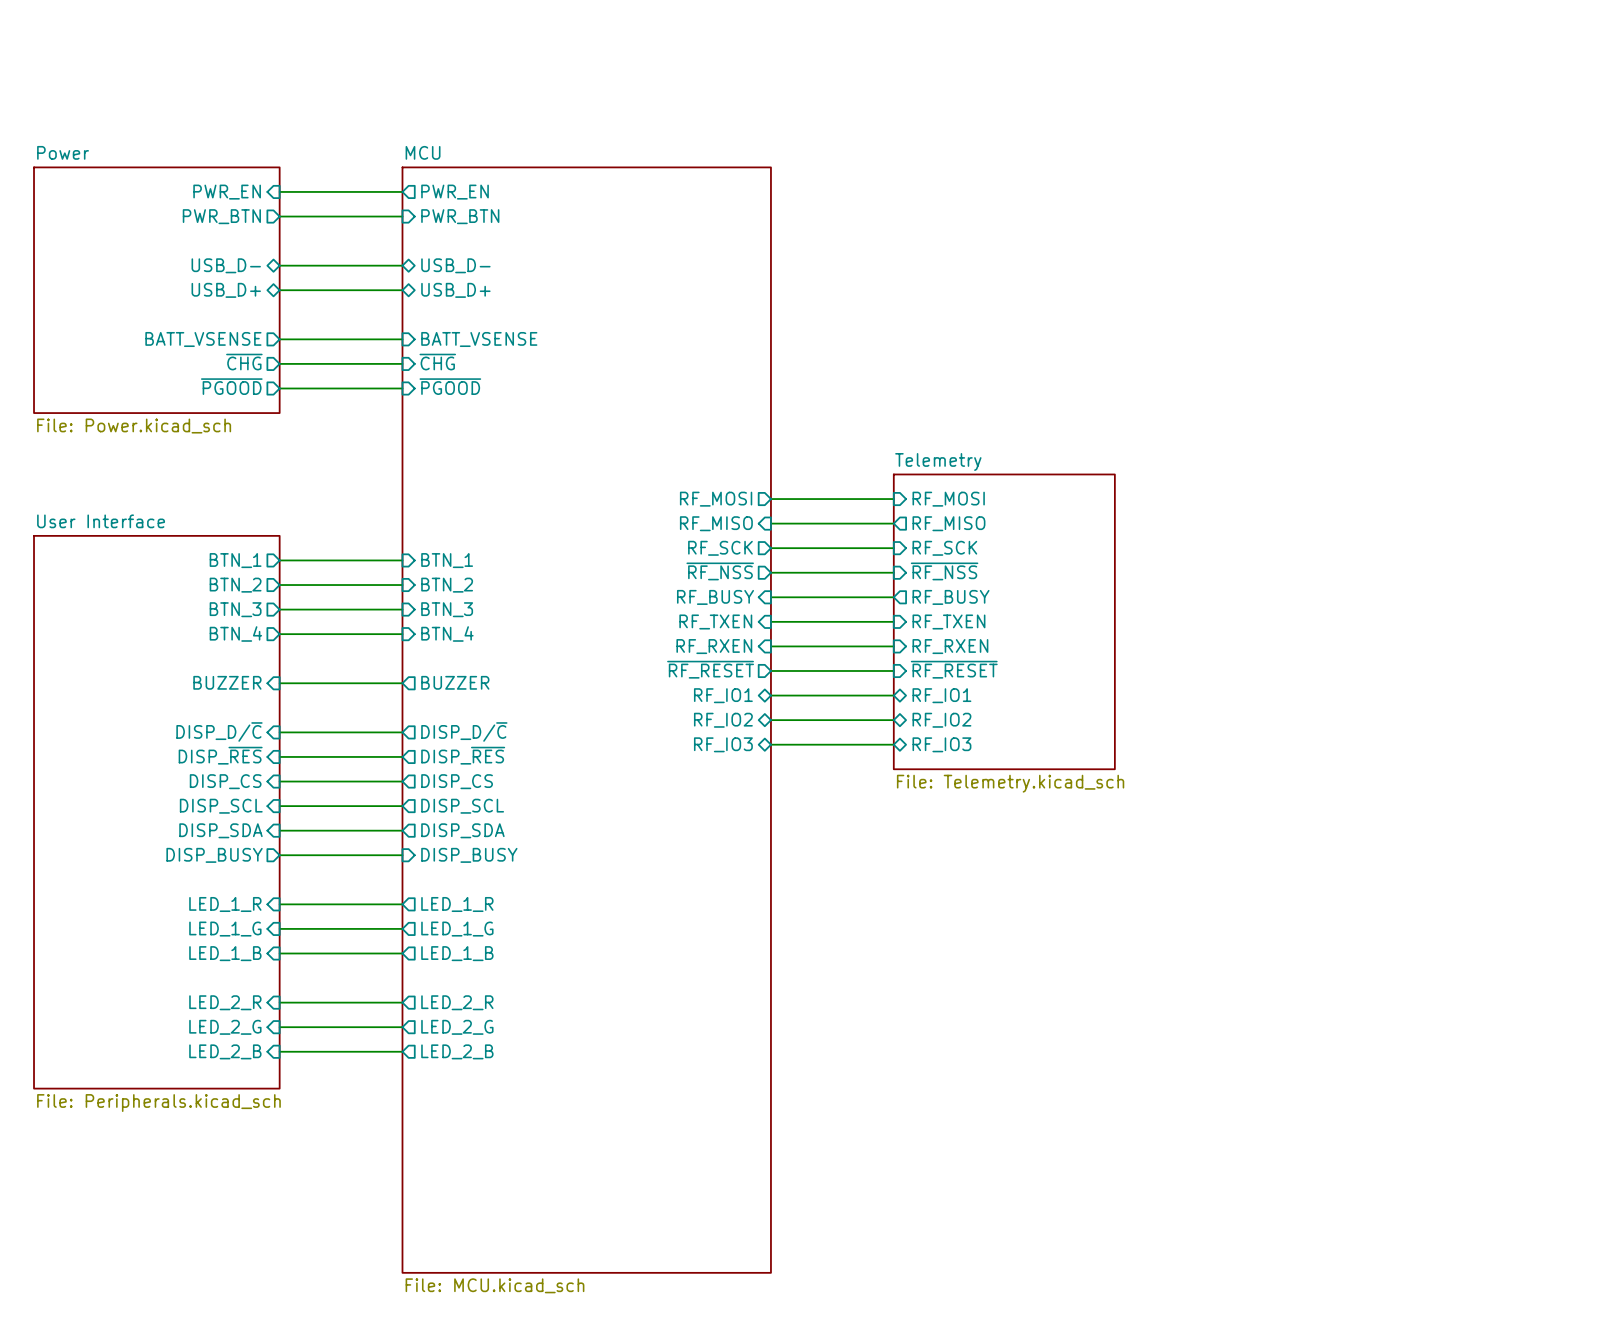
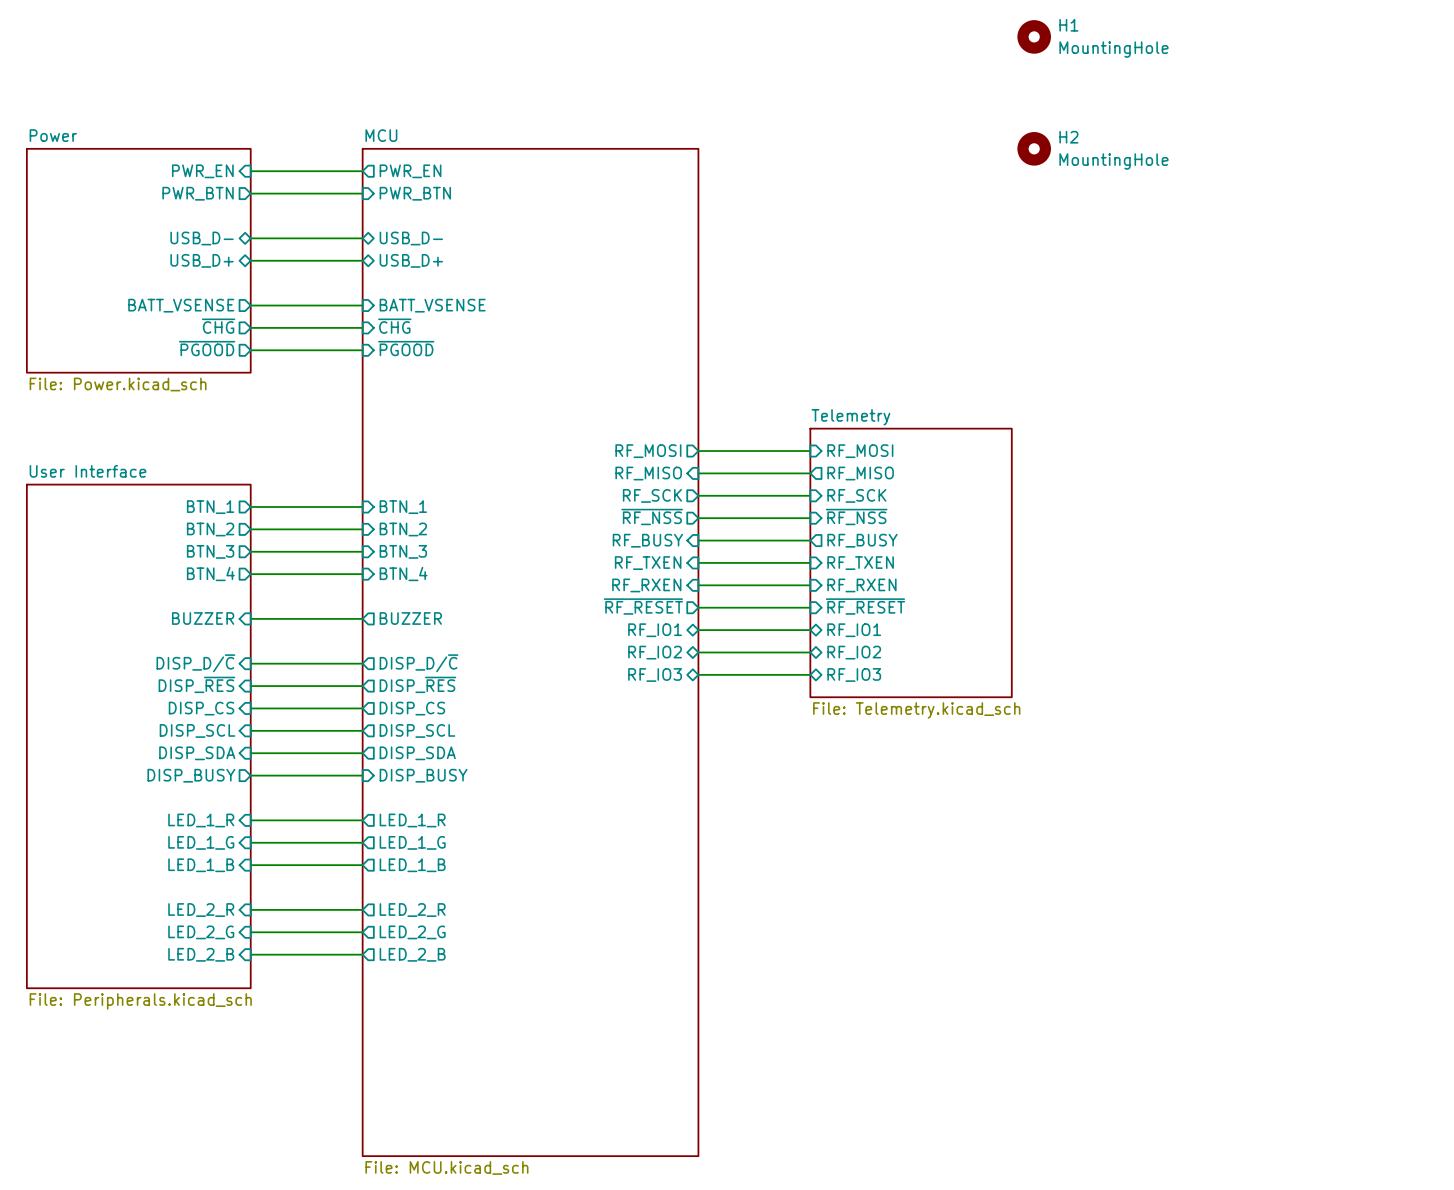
H1: none -> MountingHole (1034, 36)
H2: none -> MountingHole (1034, 148)

